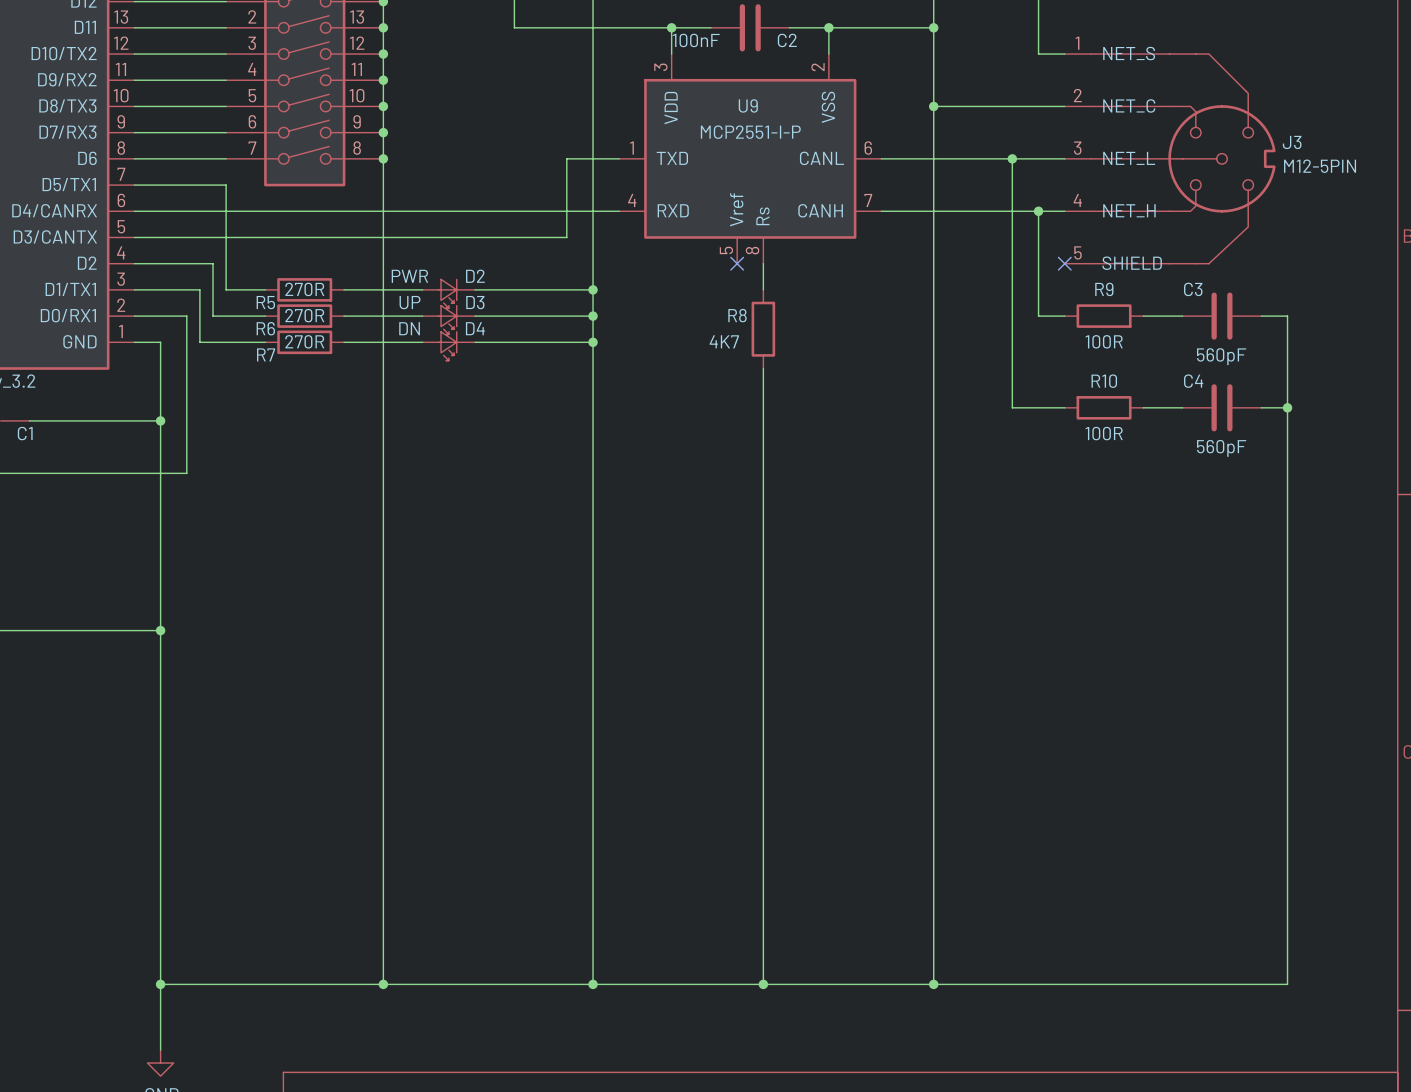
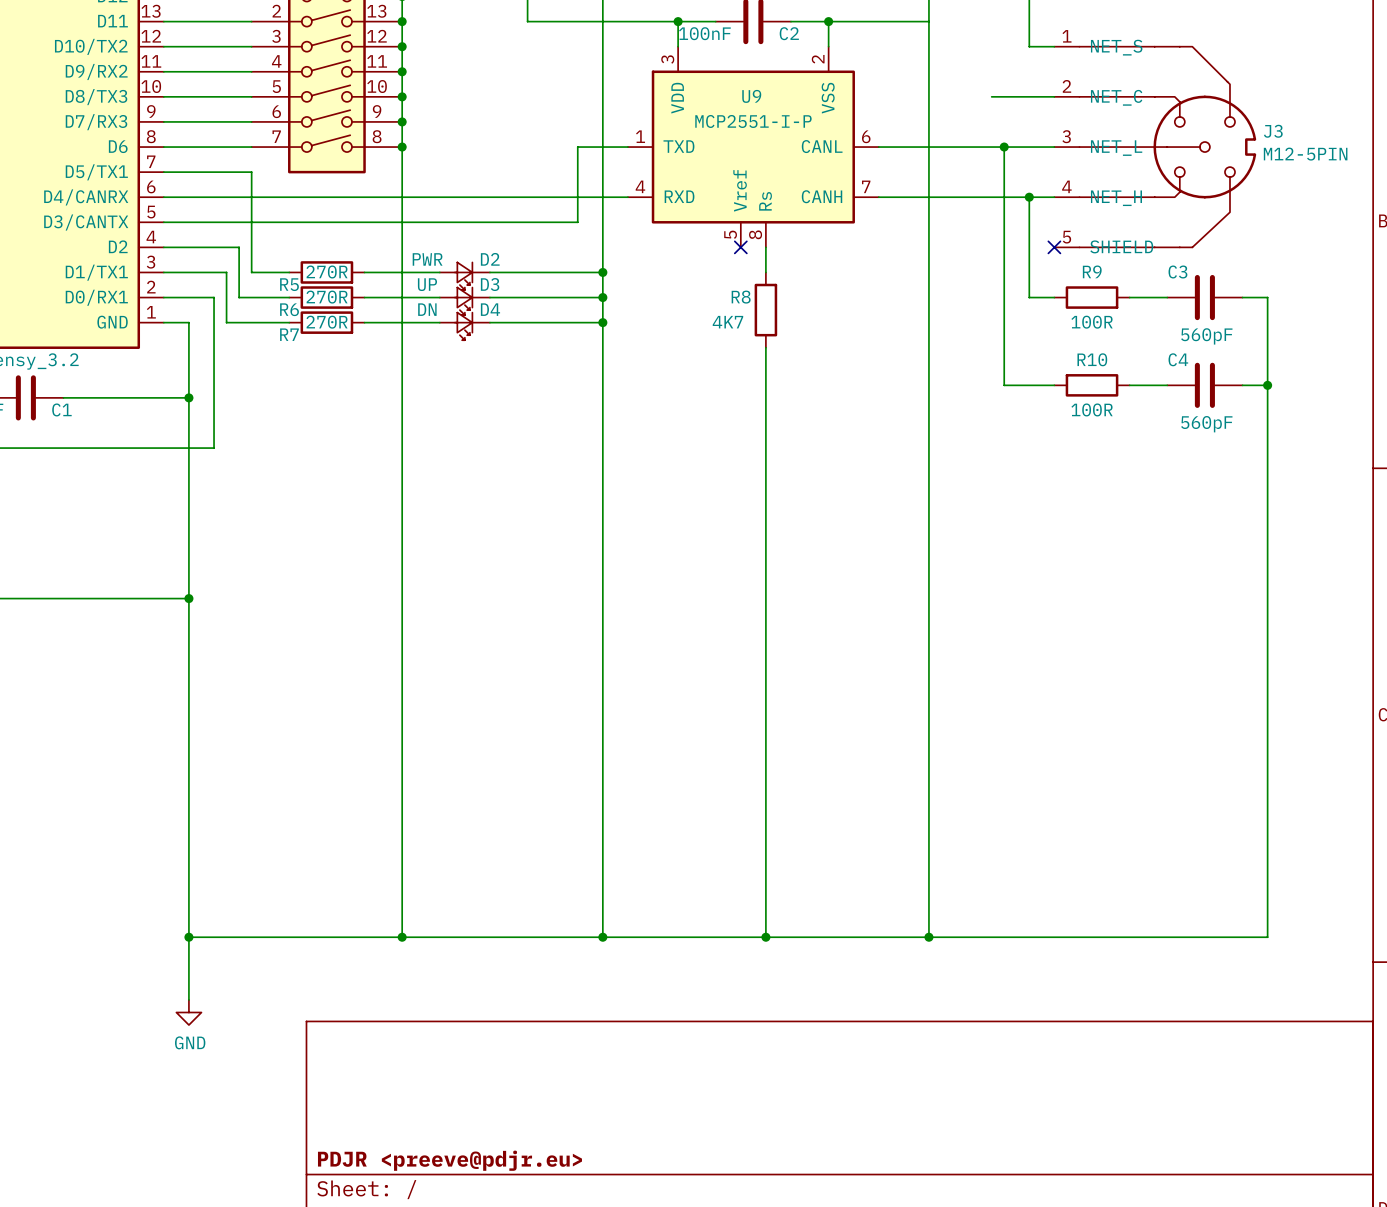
junction: (933, 27) -> none
wire: (933, 106) (999, 106) -> none
junction: (933, 106) -> none

